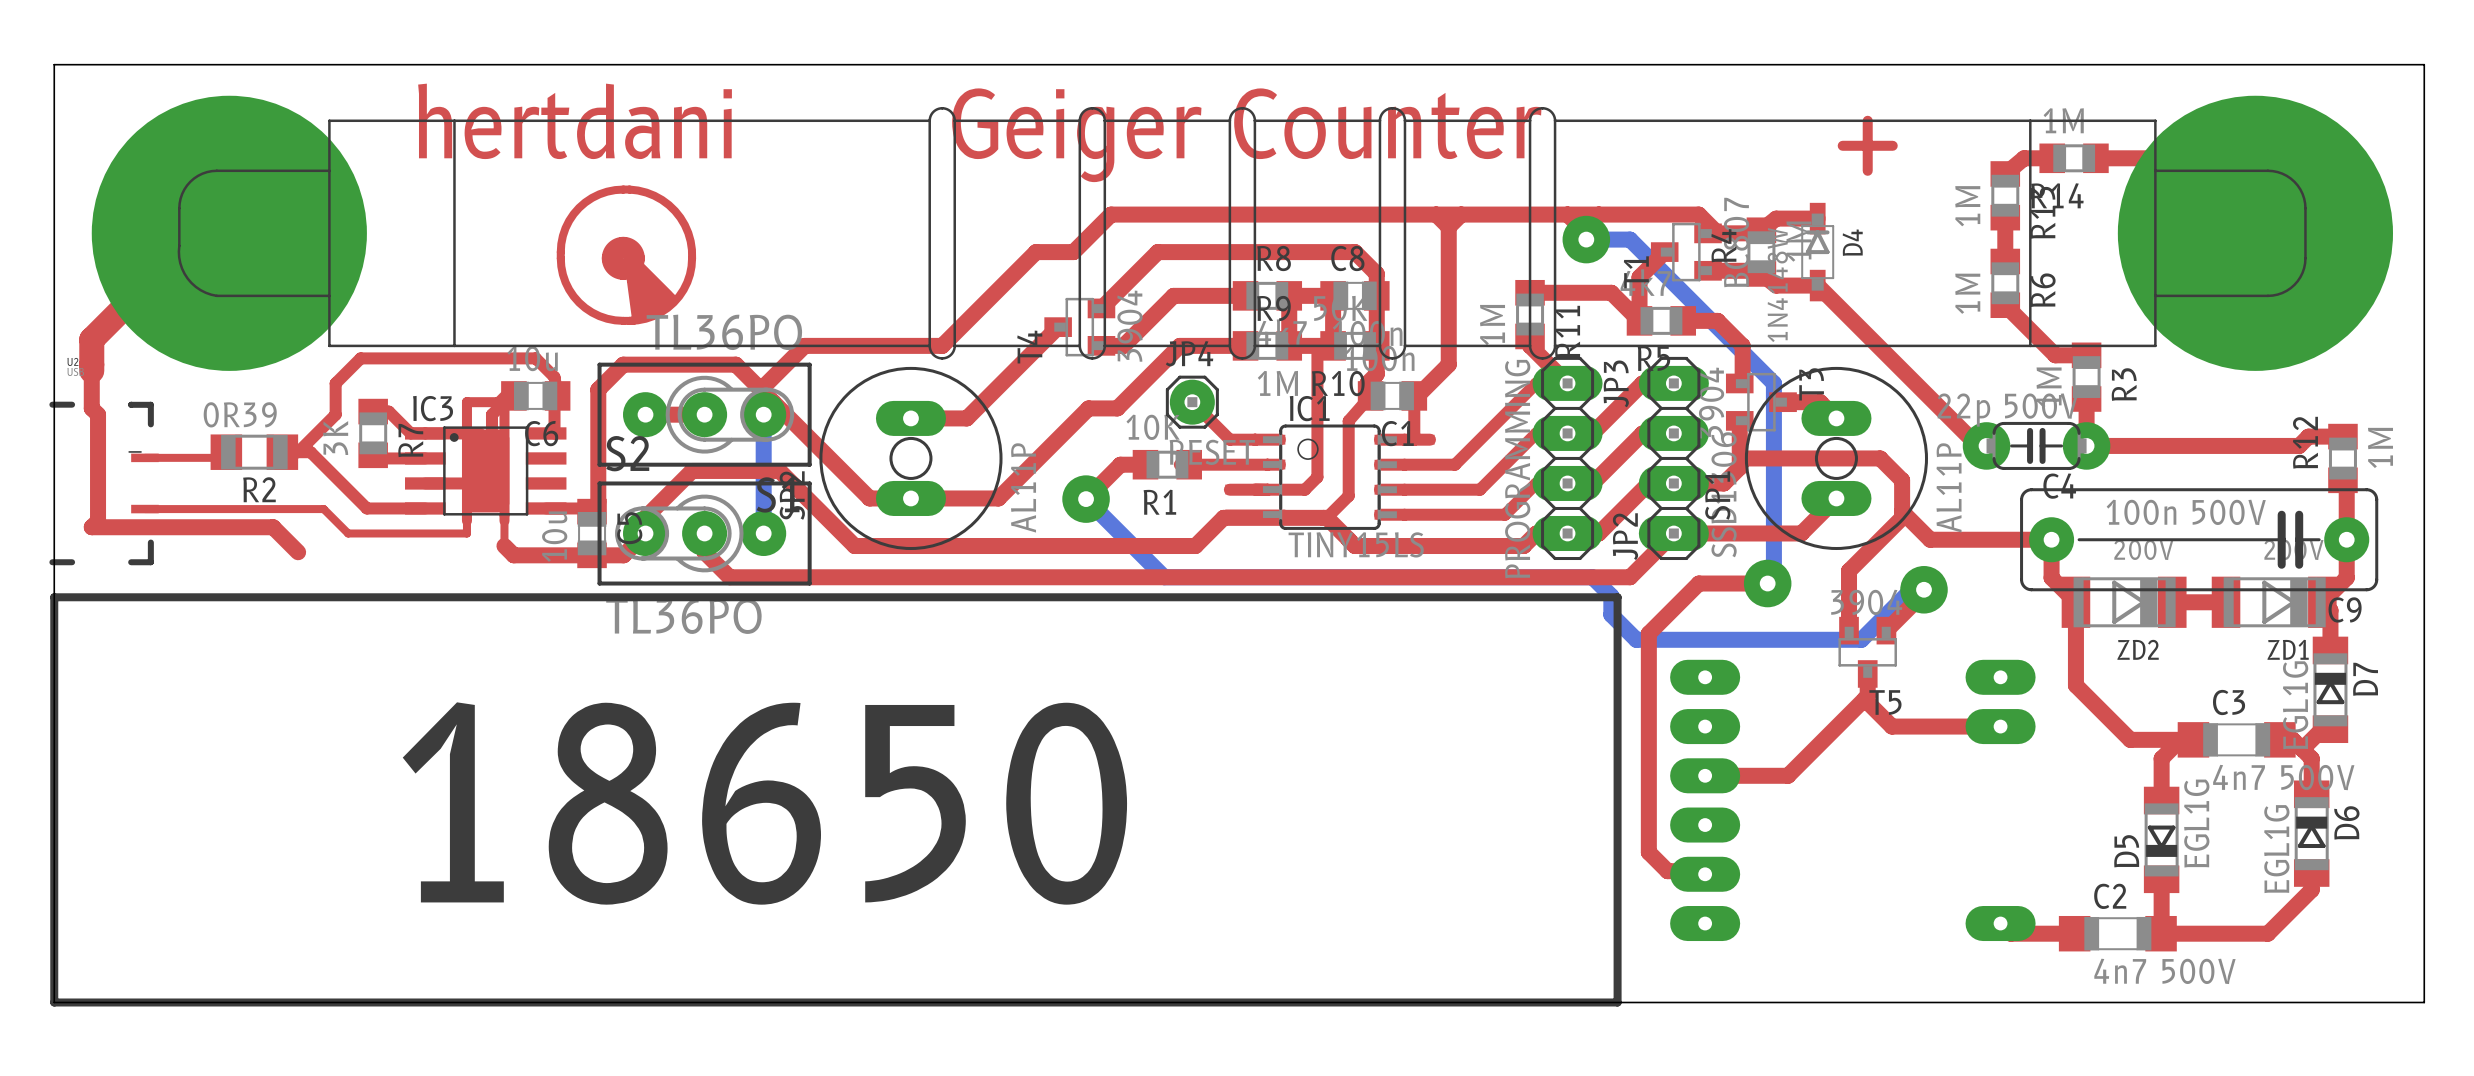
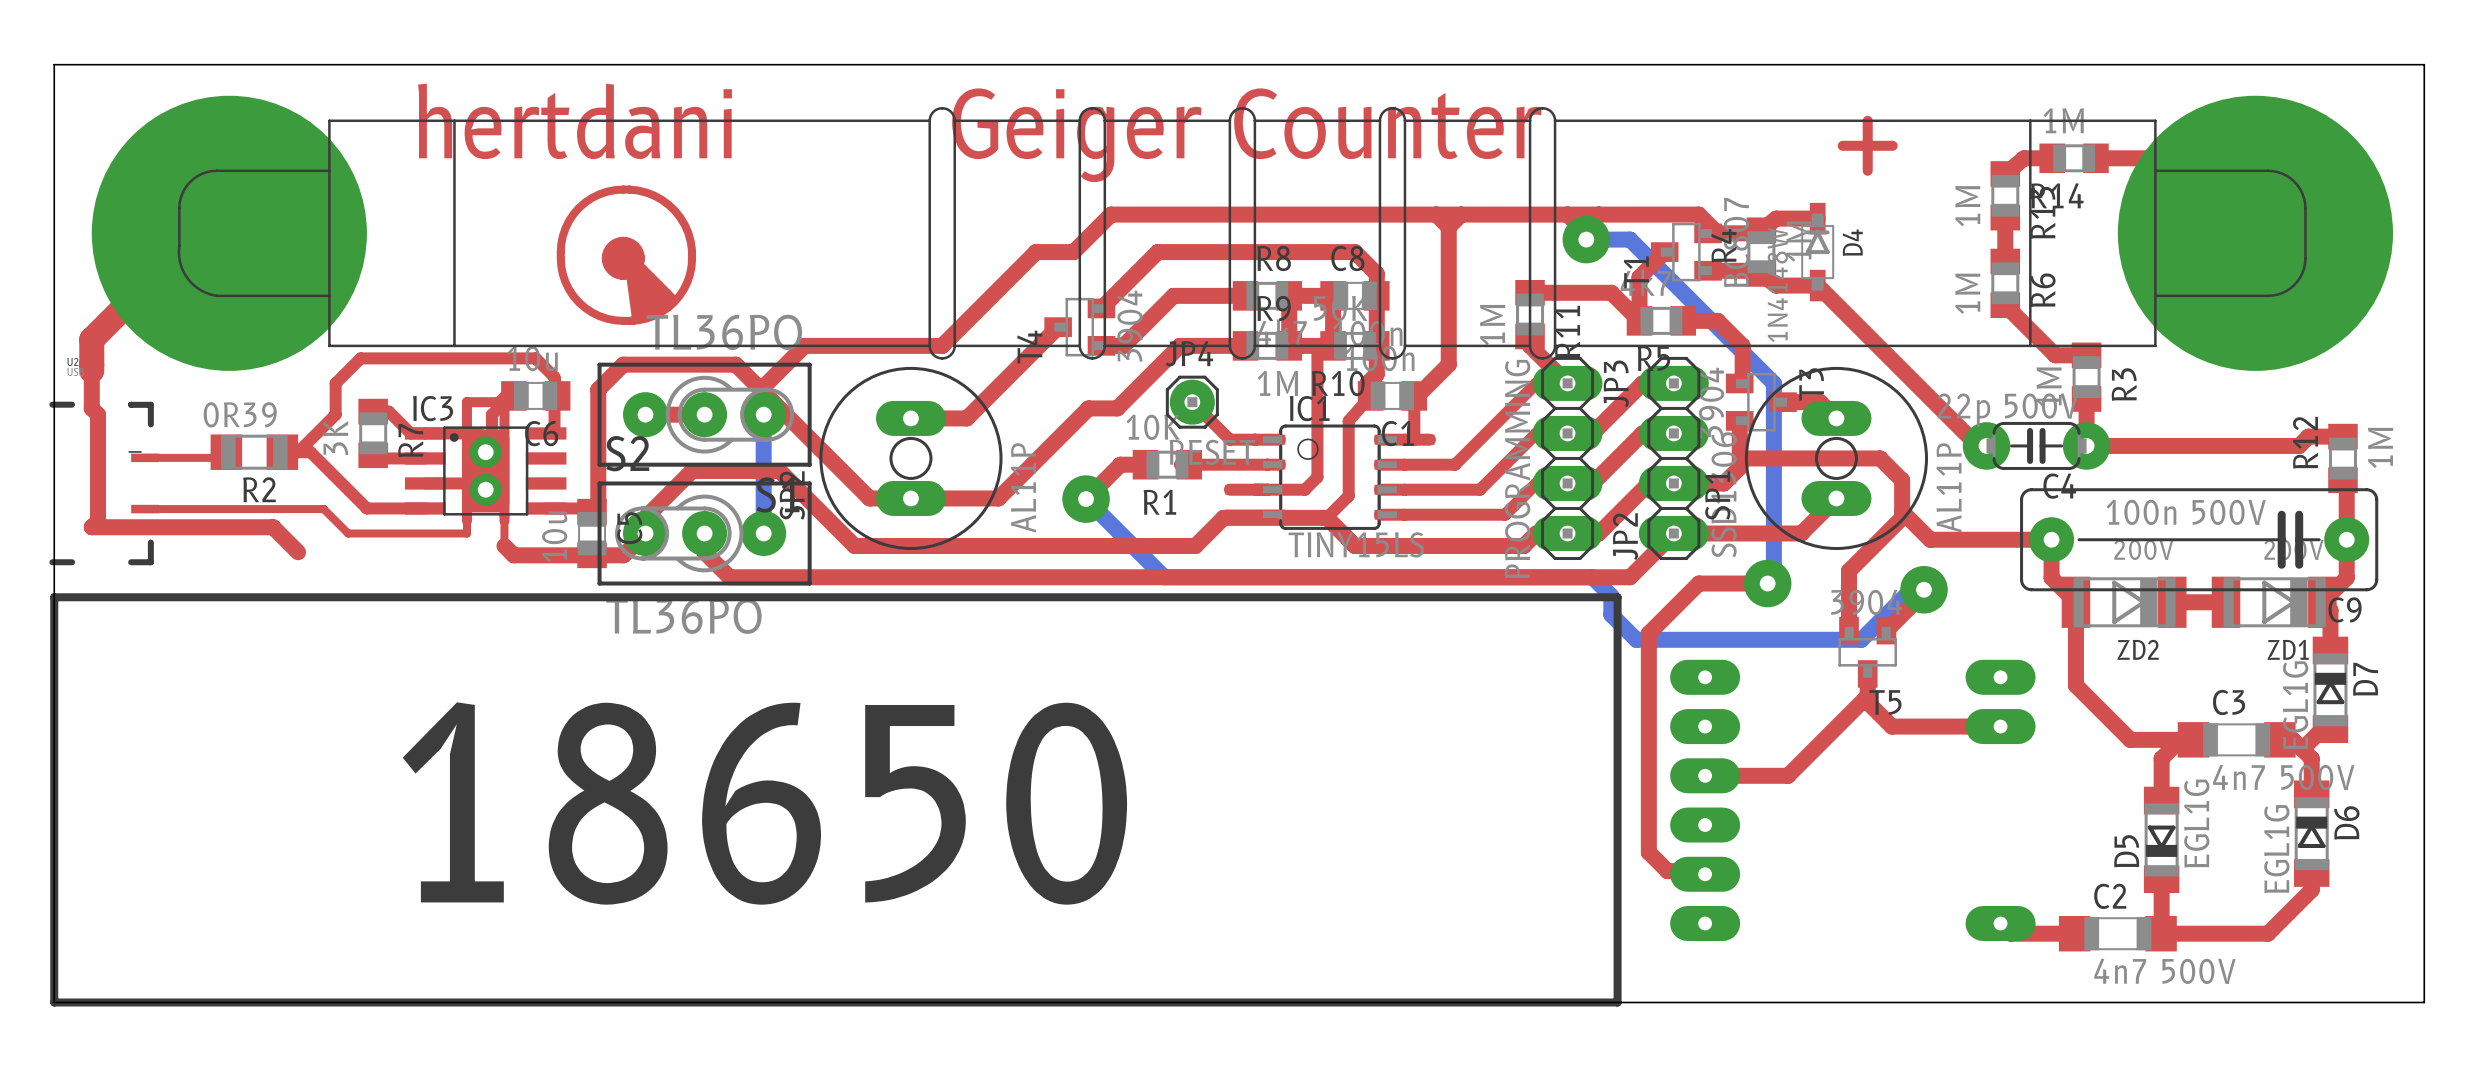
via: none -> (485, 452)
via: none -> (485, 489)

